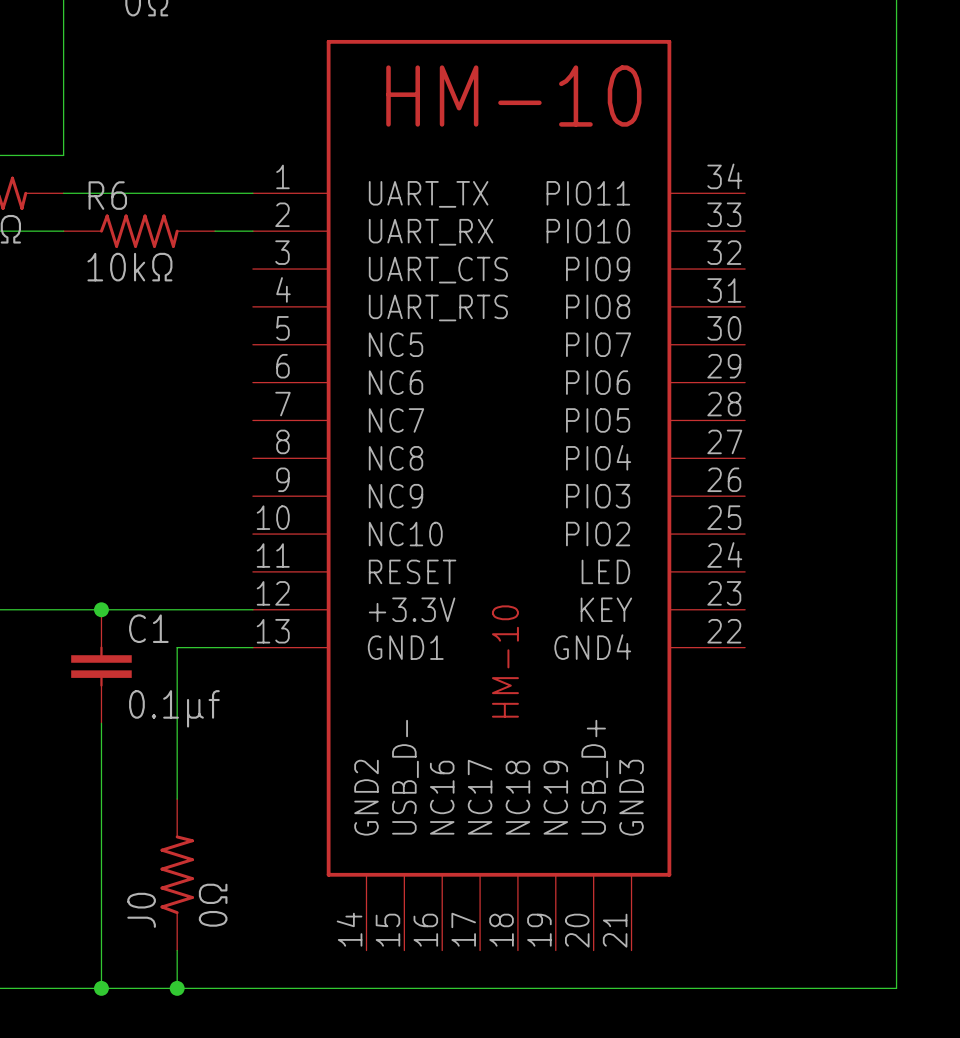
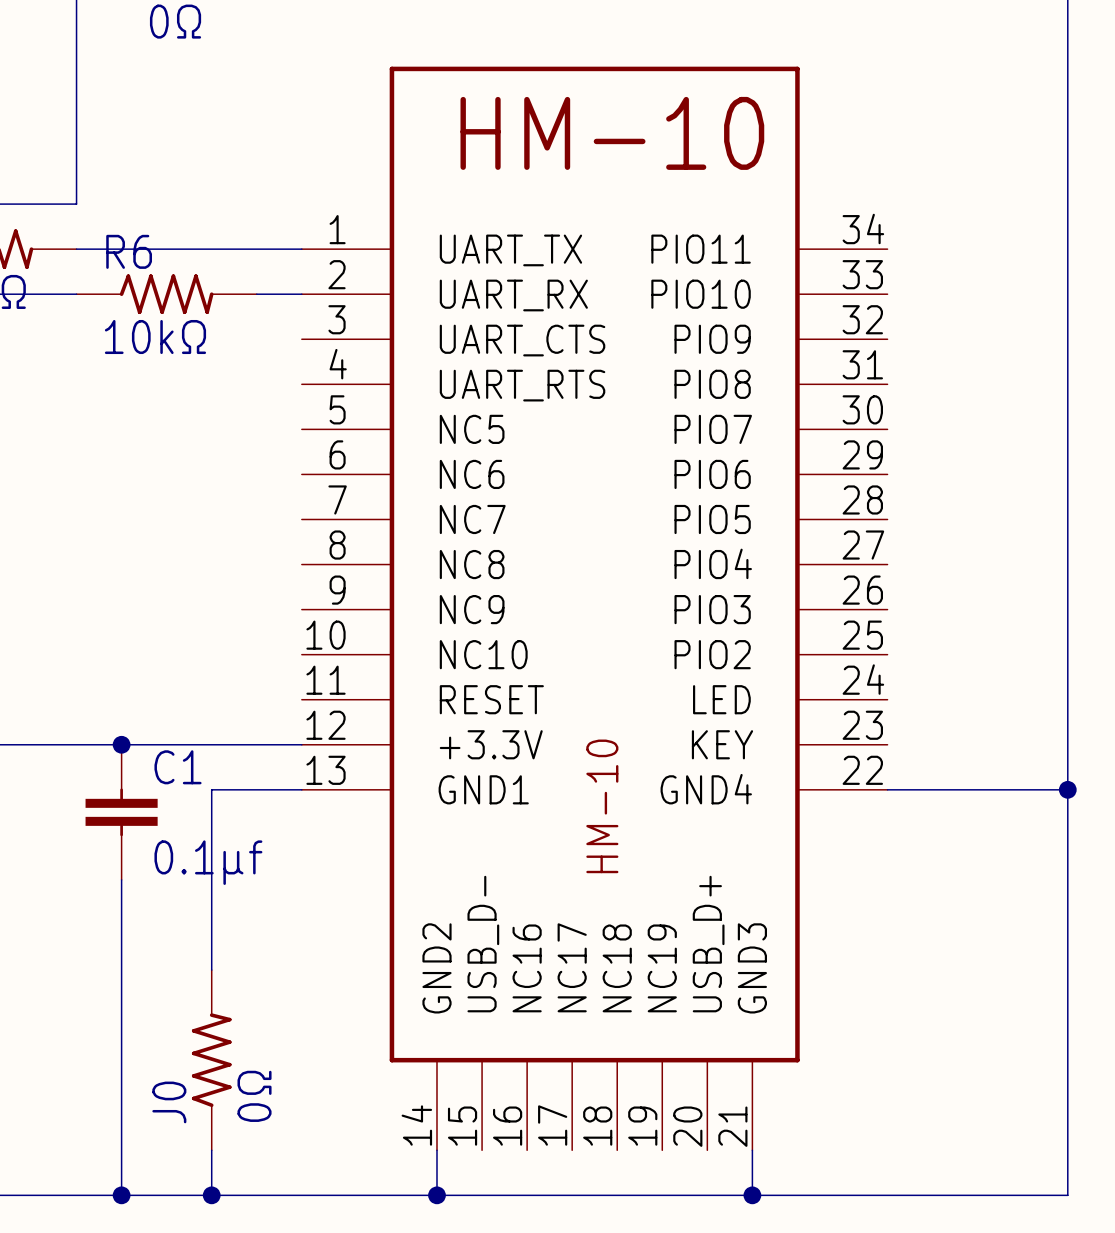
wire: none -> (887, 789) (1067, 789)
junction: none -> (1067, 789)
wire: none -> (436, 1150) (436, 1195)
wire: none -> (752, 1150) (752, 1195)
junction: none -> (436, 1195)
junction: none -> (752, 1195)

